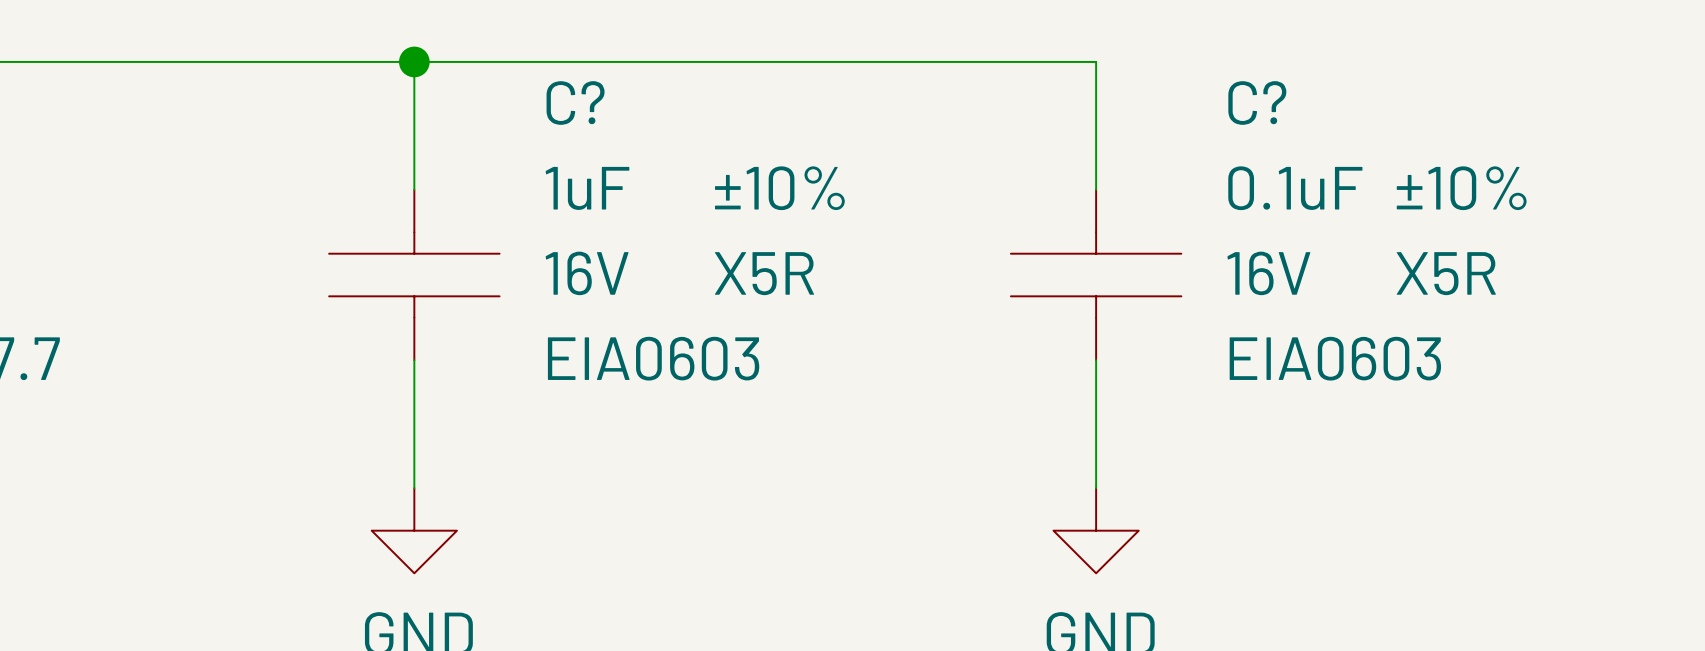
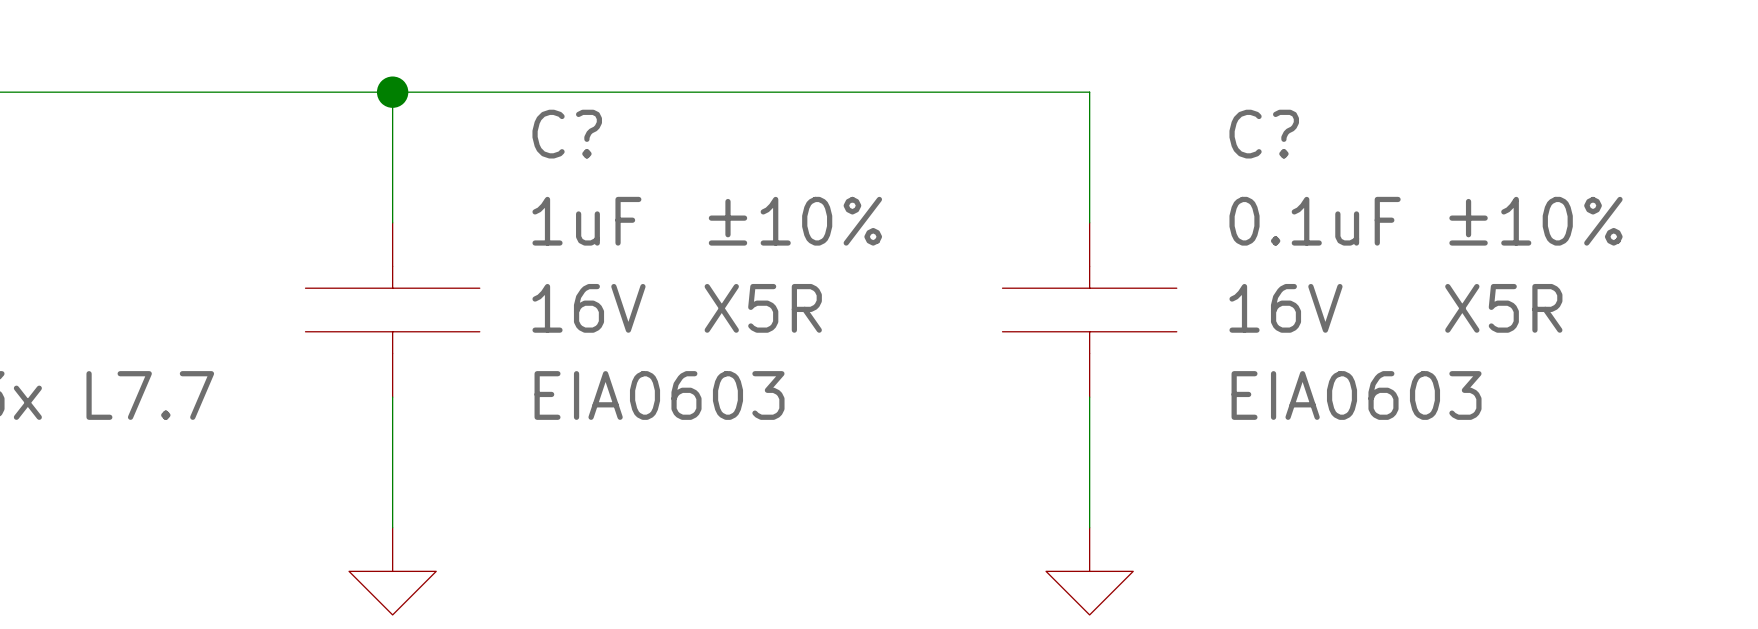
C? text position: ±10% (1461, 188) -> ±10% (1535, 221)
C? text position: X5R (1446, 273) -> X5R (1503, 308)

